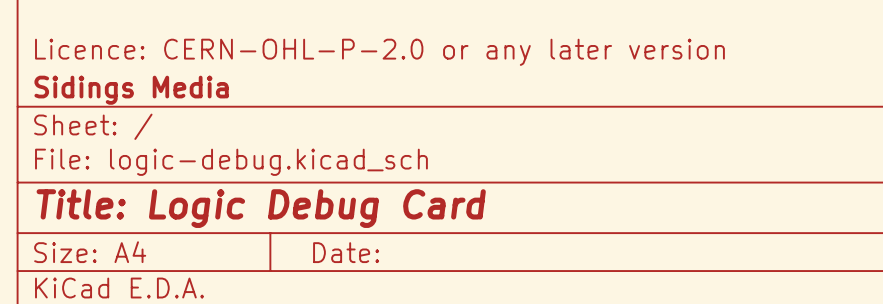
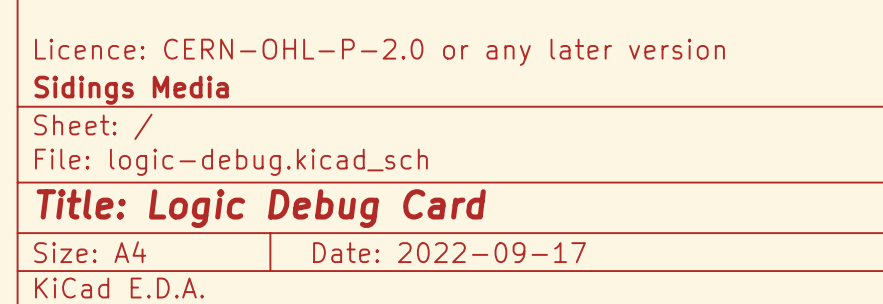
title block: Date: (346, 252) -> Date: 2022-09-17 (449, 252)

